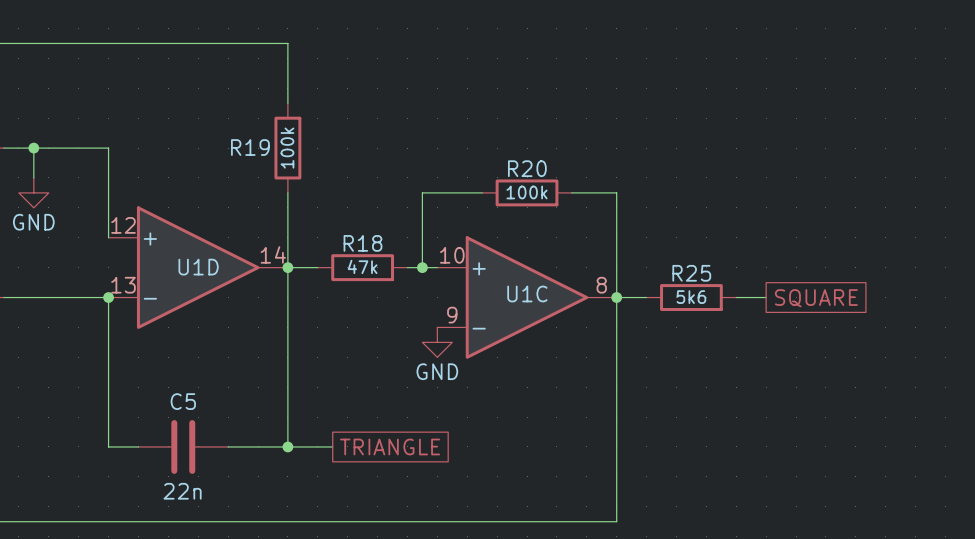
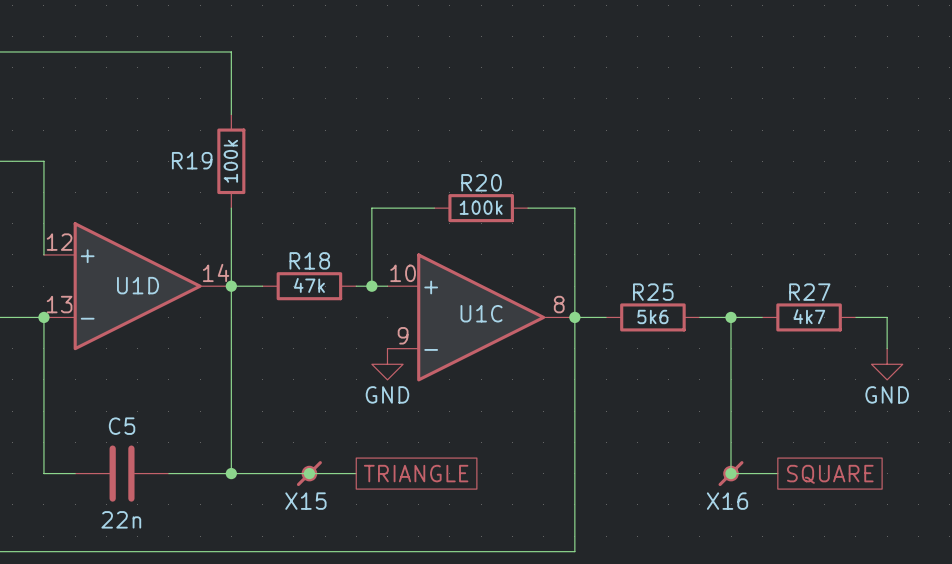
junction: none -> (731, 317)
wire: none -> (762, 317) (731, 317) (731, 473) (777, 473)
R27: none -> 4k7 (809, 317)
wire: none -> (855, 317) (887, 317) (887, 348)
global label position: SQUARE (816, 298) -> SQUARE (830, 474)
power symbol: none -> GND (887, 364)
wire: none -> (278, 473) (356, 473)
X15: none -> (309, 473)
junction: none -> (309, 473)
global label position: TRIANGLE (390, 446) -> TRIANGLE (416, 473)
X16: none -> (731, 473)
junction: none -> (731, 473)

